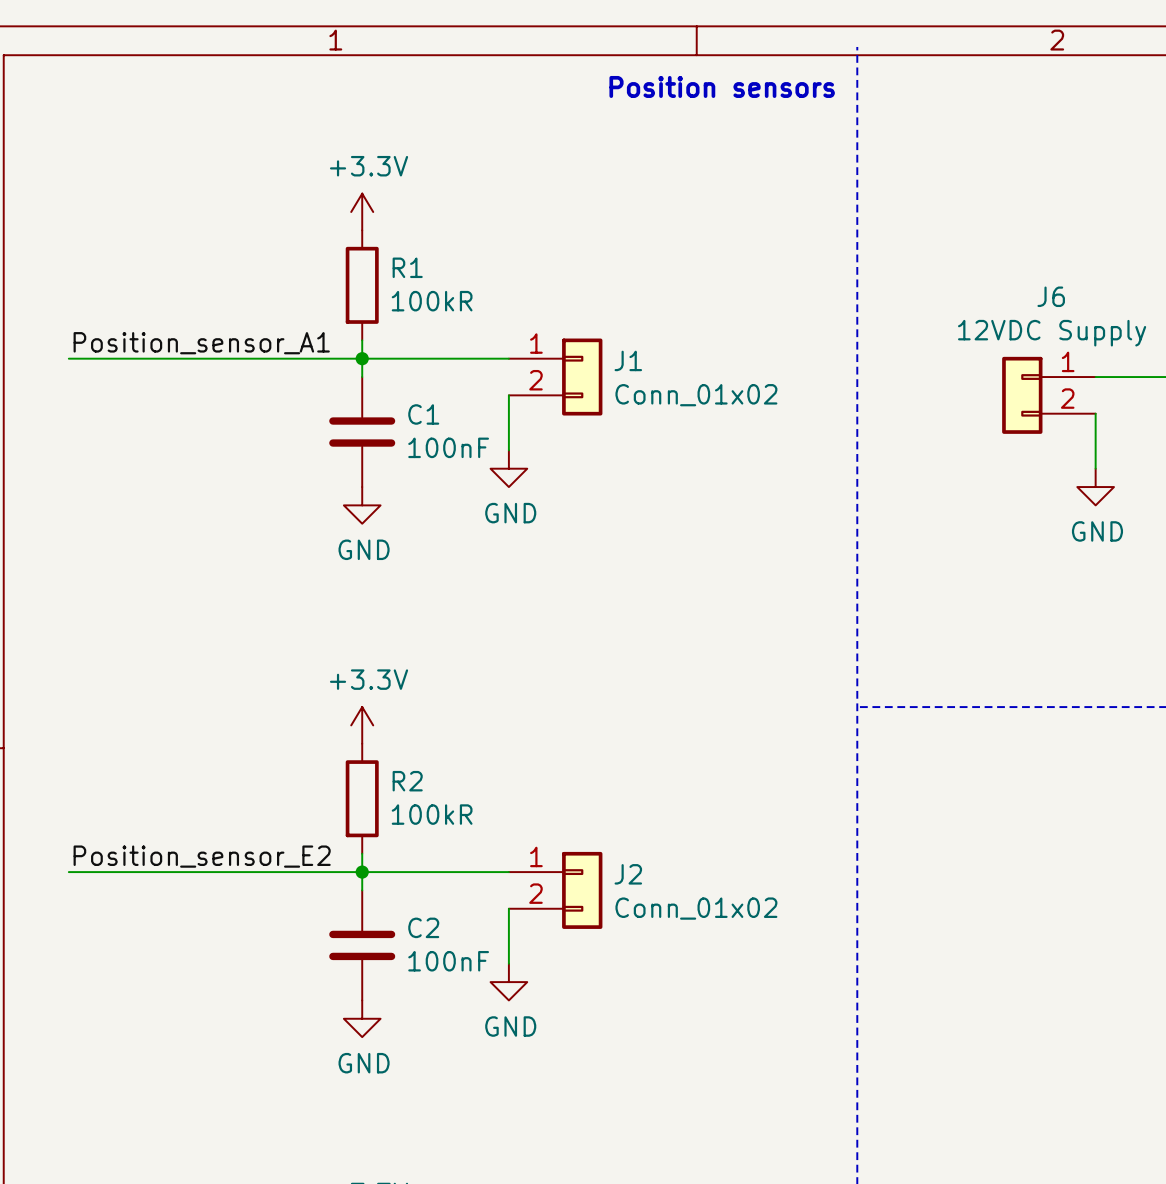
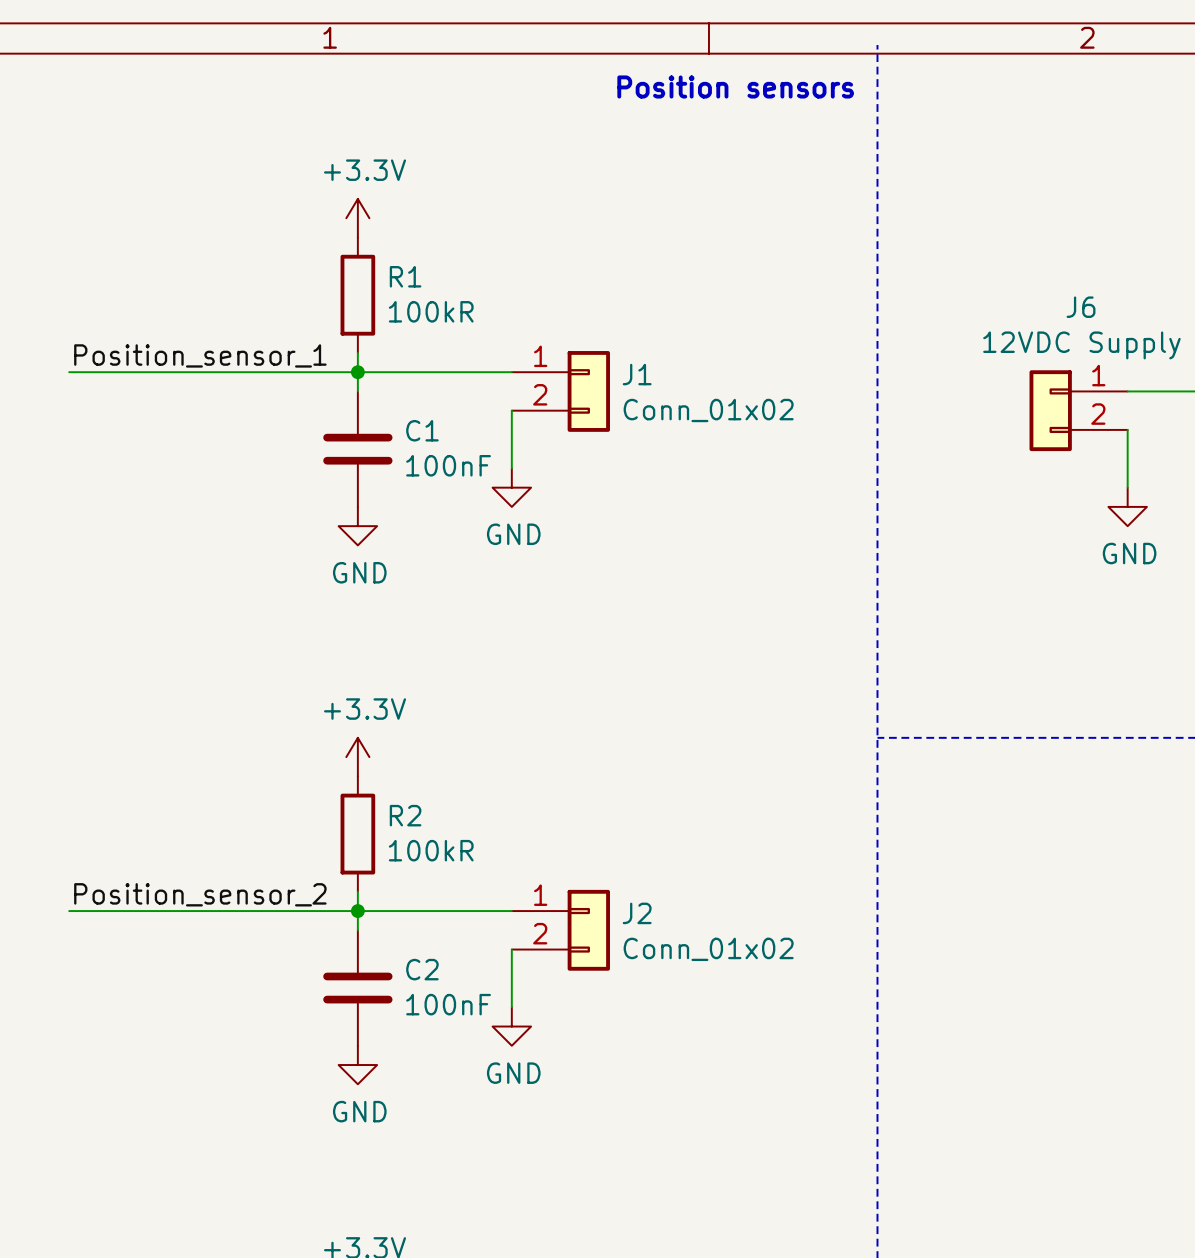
label: Position_sensor_A1 (201, 343) -> Position_sensor_1 (200, 355)
wire: (68, 358) (87, 358) -> none
label: Position_sensor_E2 (202, 856) -> Position_sensor_2 (200, 894)
wire: (68, 872) (87, 872) -> none

